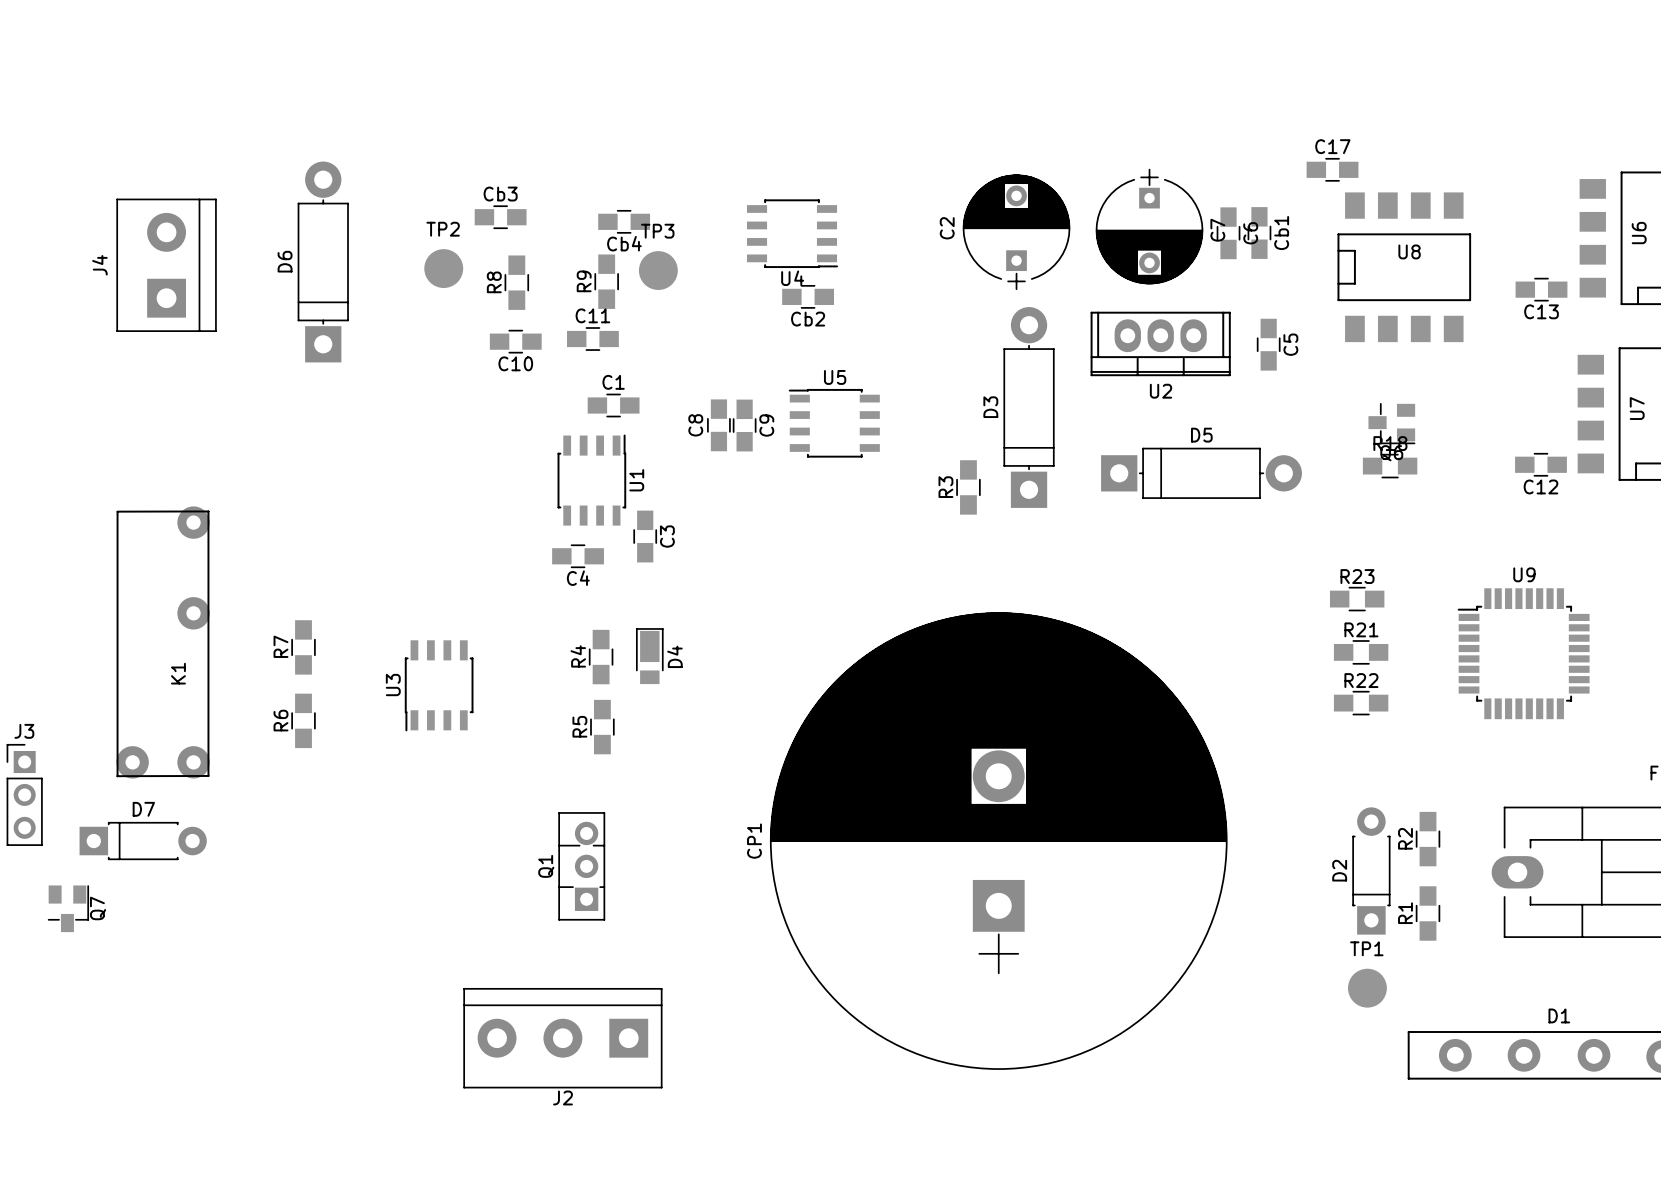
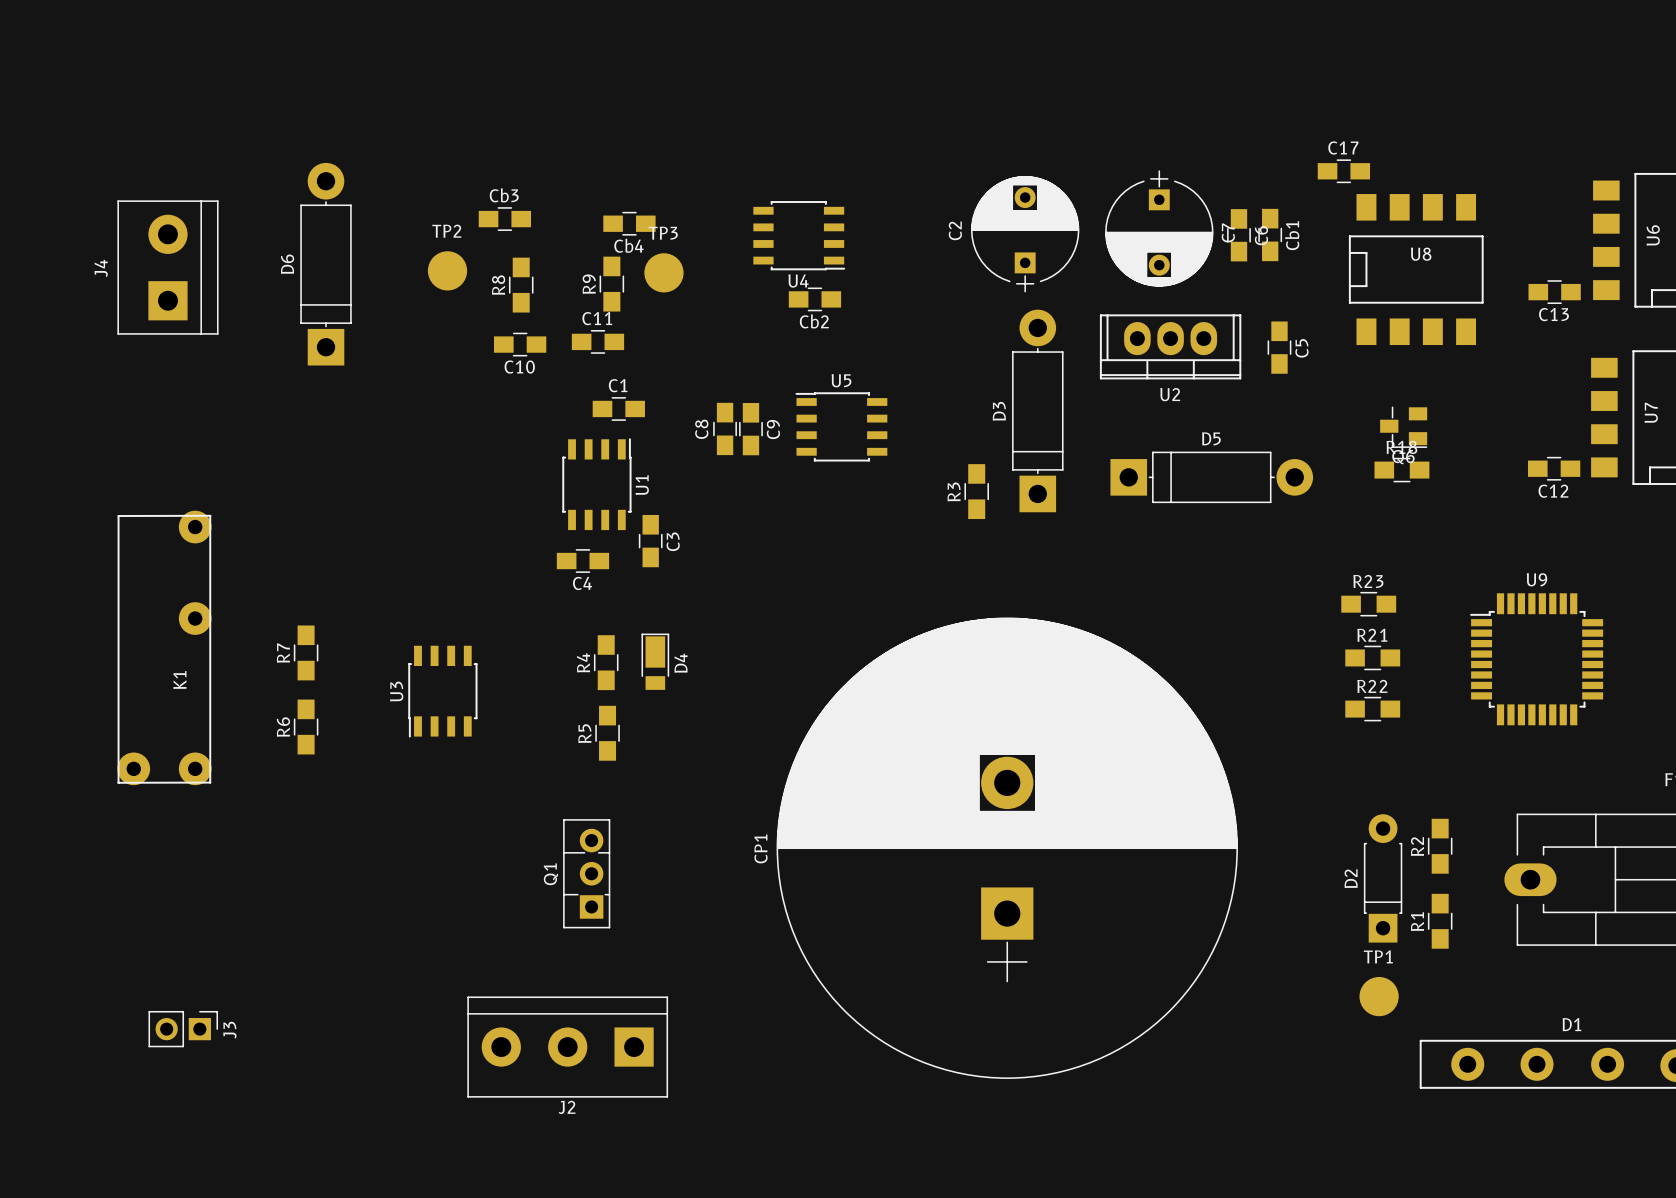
J3 name position: J3 (24, 731) -> J3 (229, 1030)
J3 footprint: [6, 744, 43, 846] -> [148, 1010, 219, 1048]
D7: (143, 841) -> none
Q7: (68, 908) -> none

